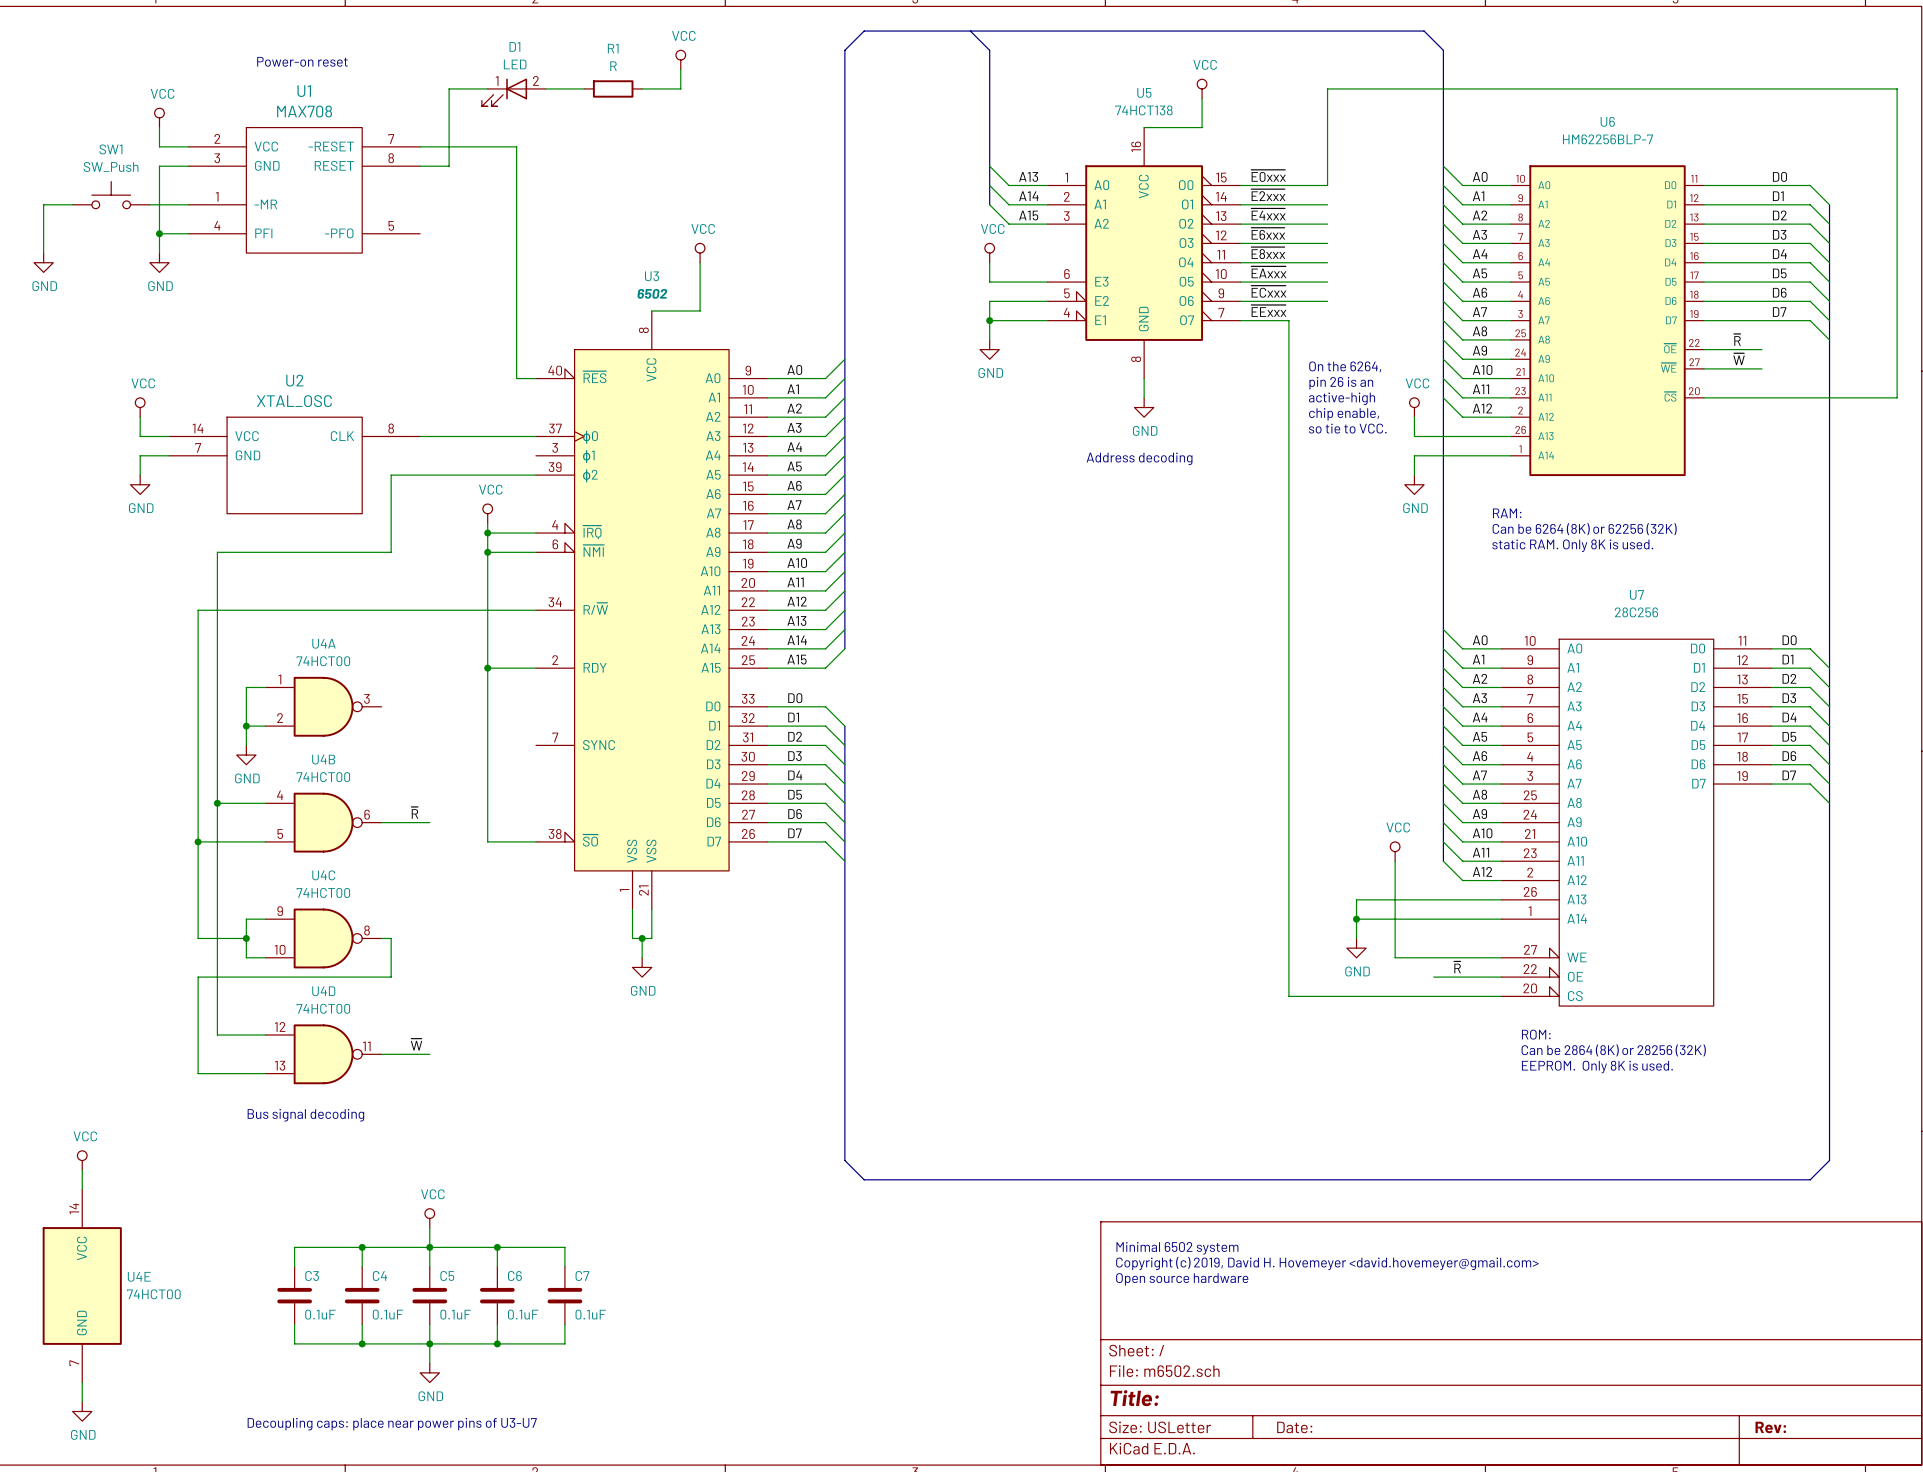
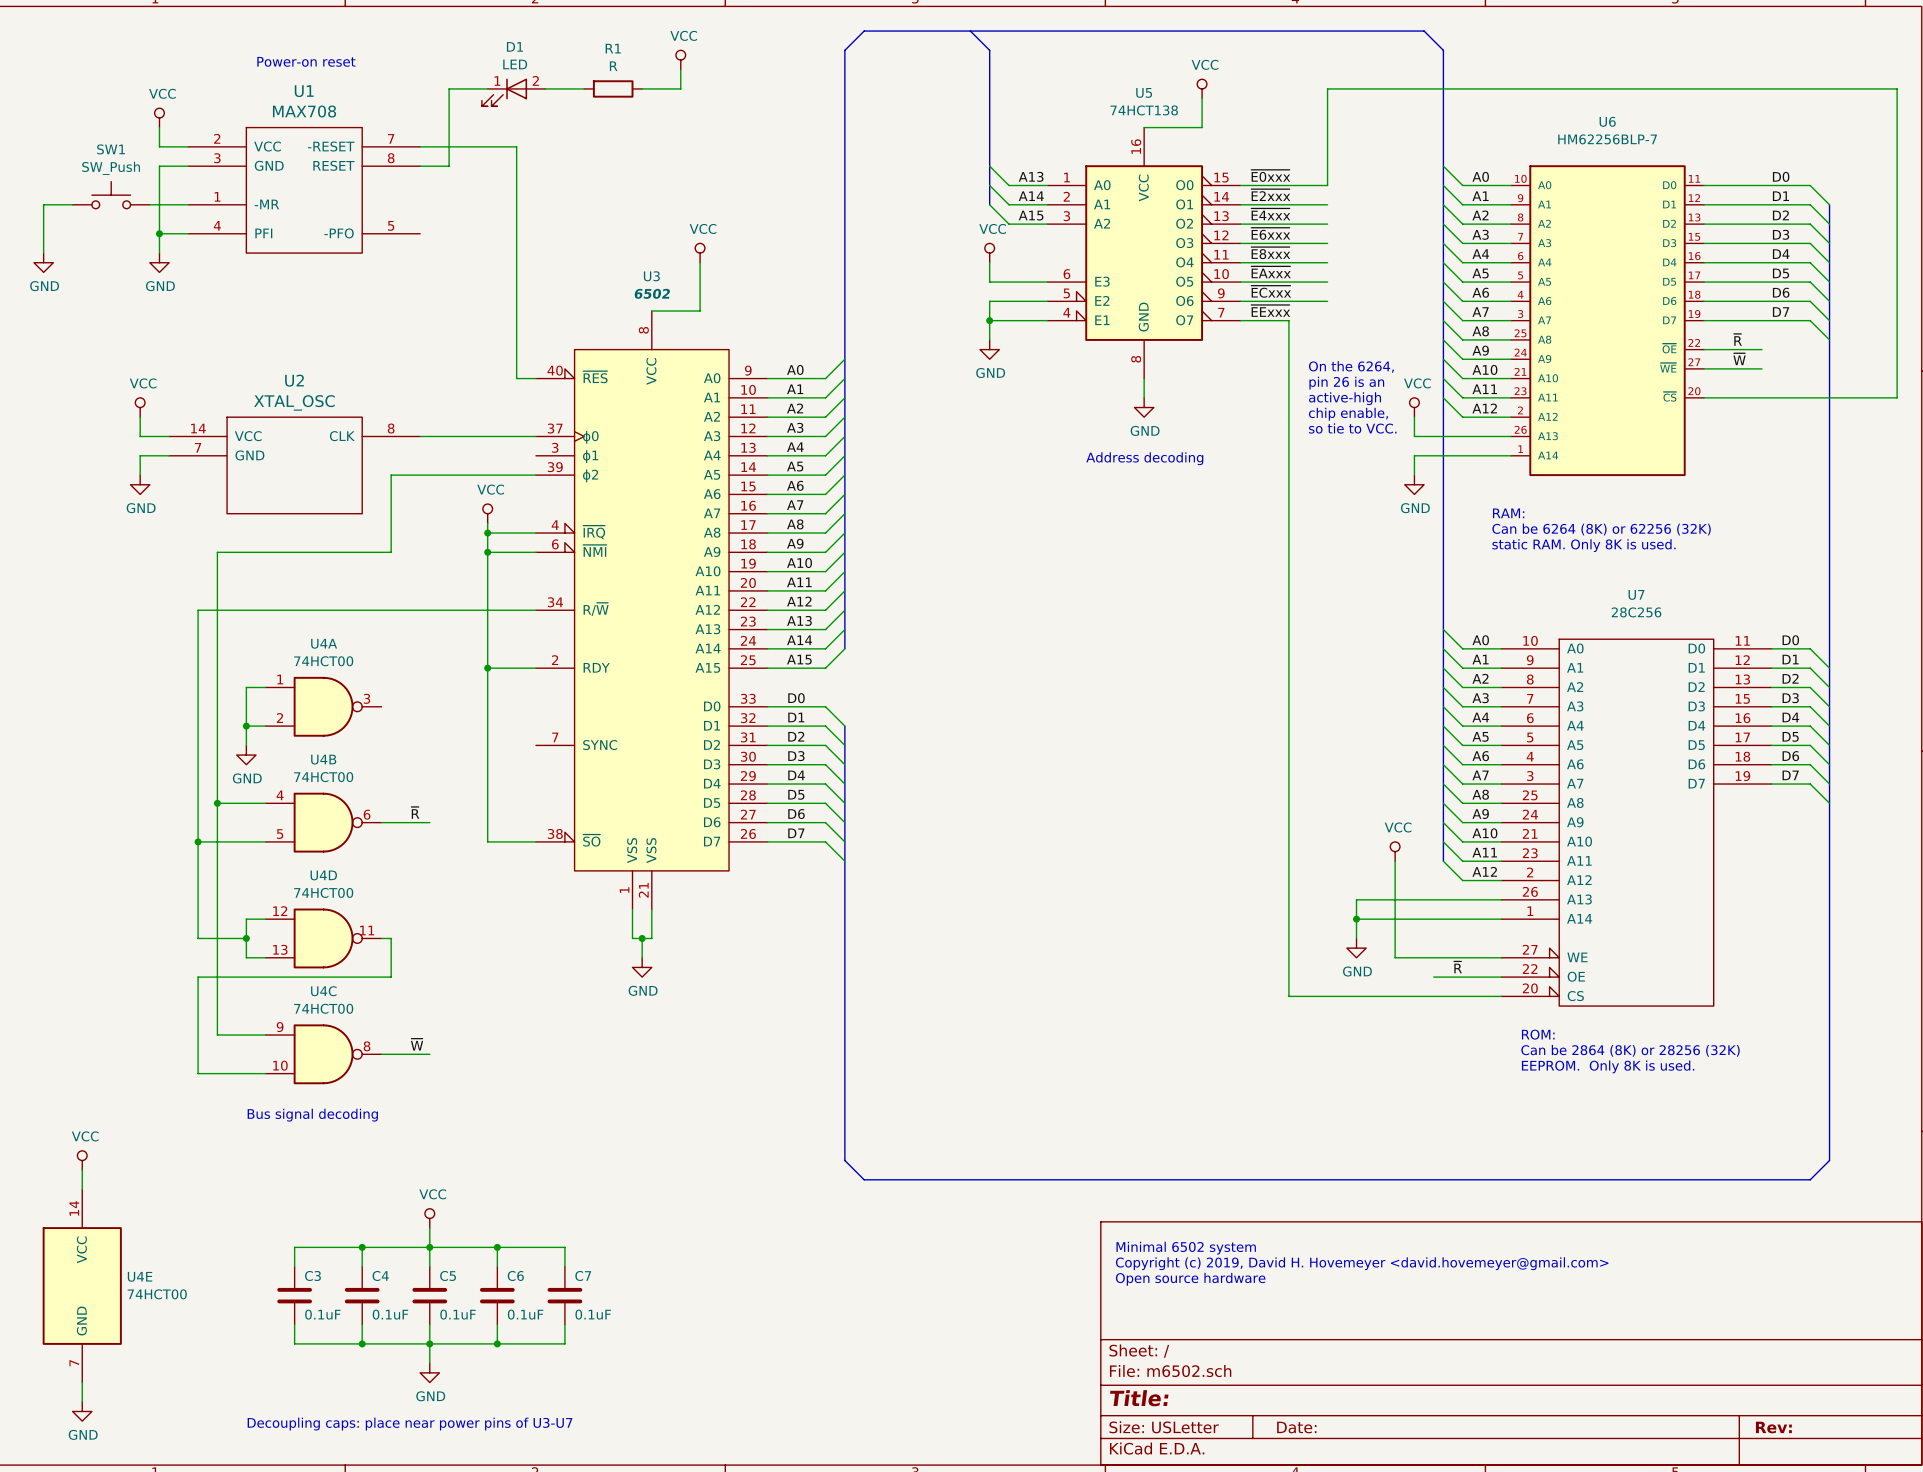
U4C position: (323, 938) -> (323, 1054)
U4D position: (323, 1054) -> (323, 938)

